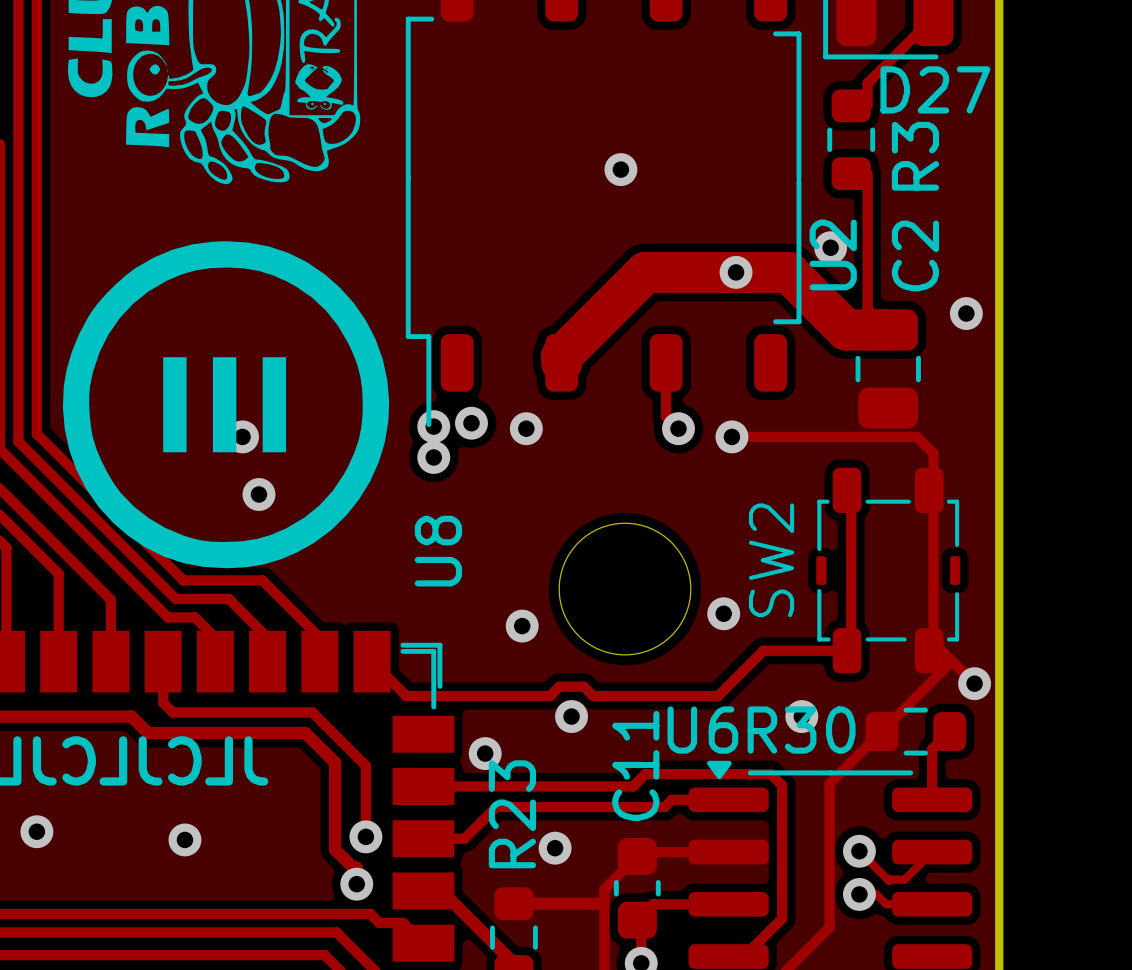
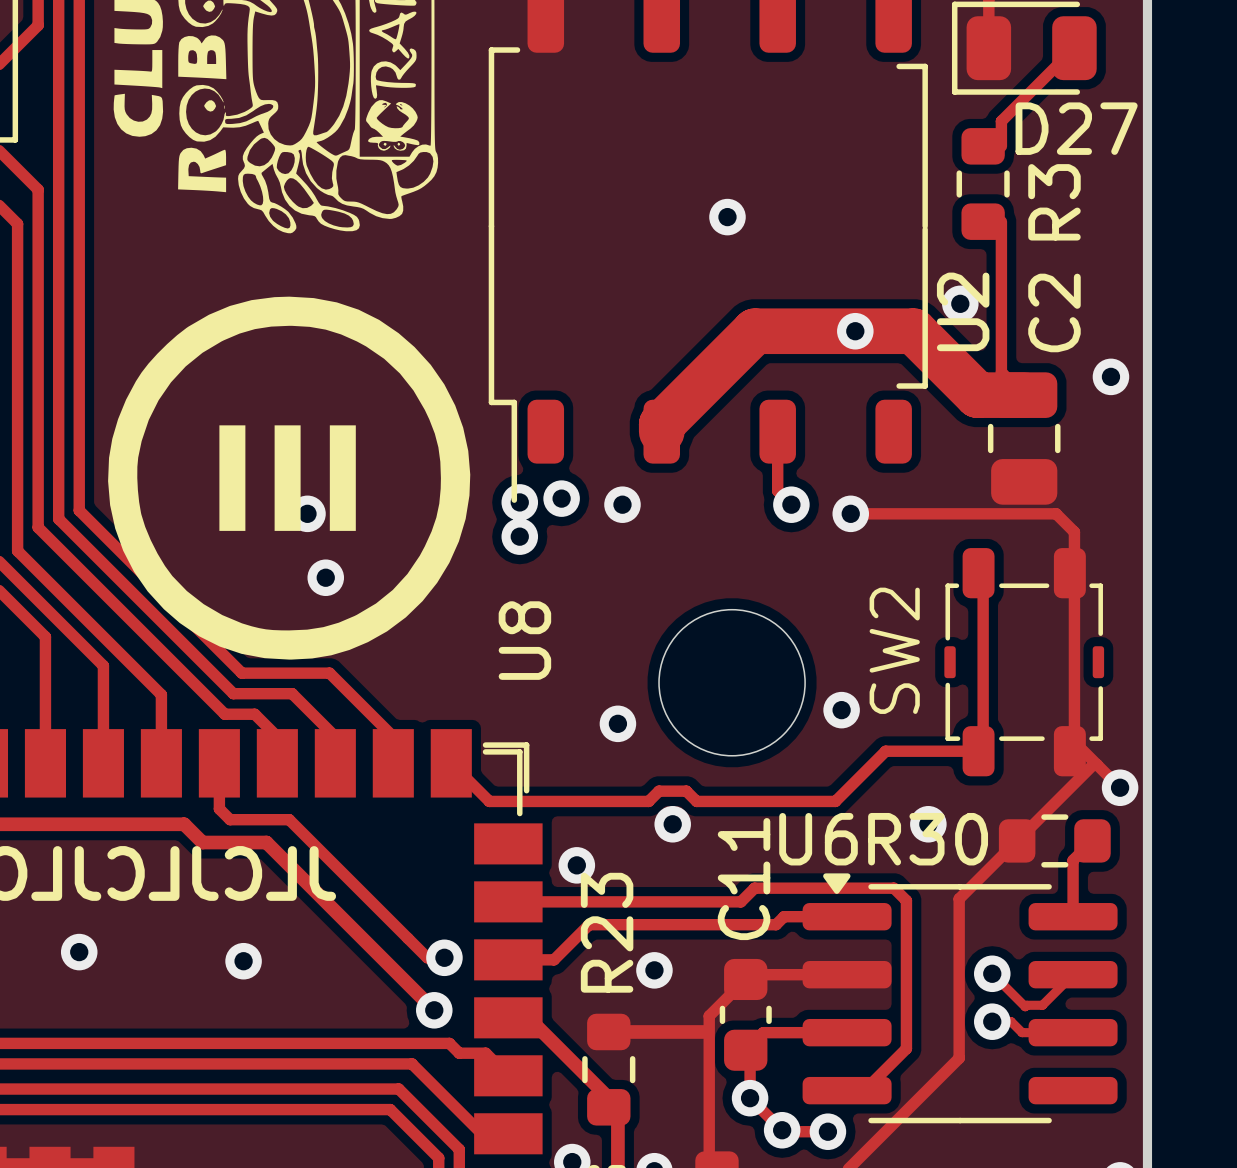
track: (226, 712) (312, 712) (365, 765) (365, 836) -> (289, 819) (427, 957) (444, 957)
track: (205, 733) (305, 733) (335, 762) (335, 849) (353, 867) (356, 867) (356, 884) -> (266, 842) (434, 1010)

